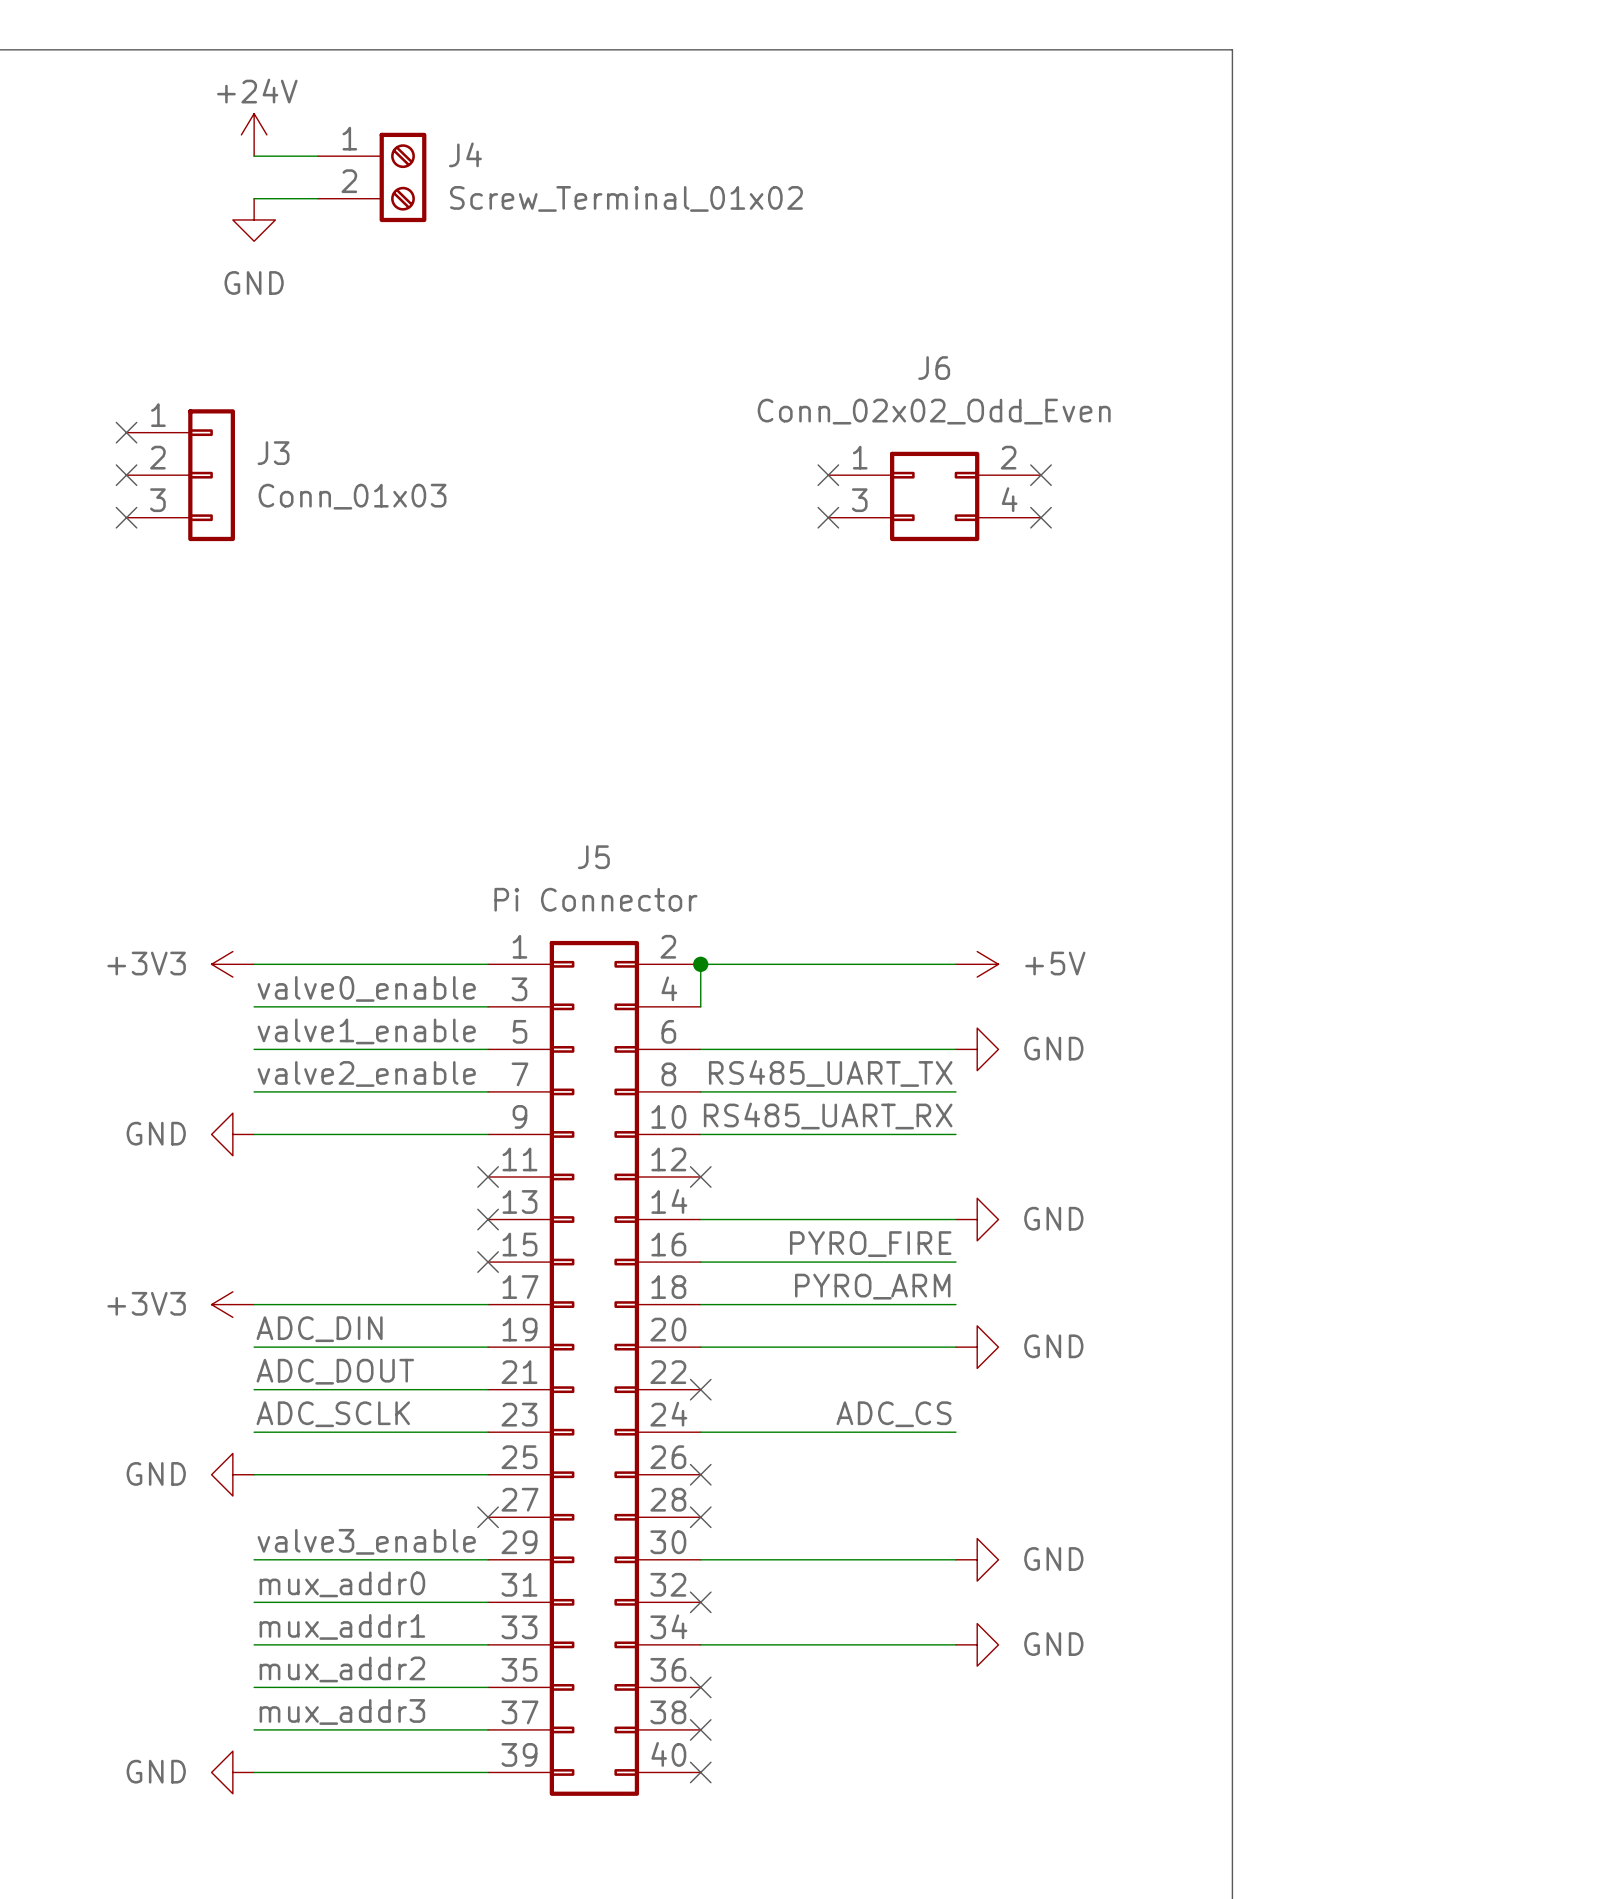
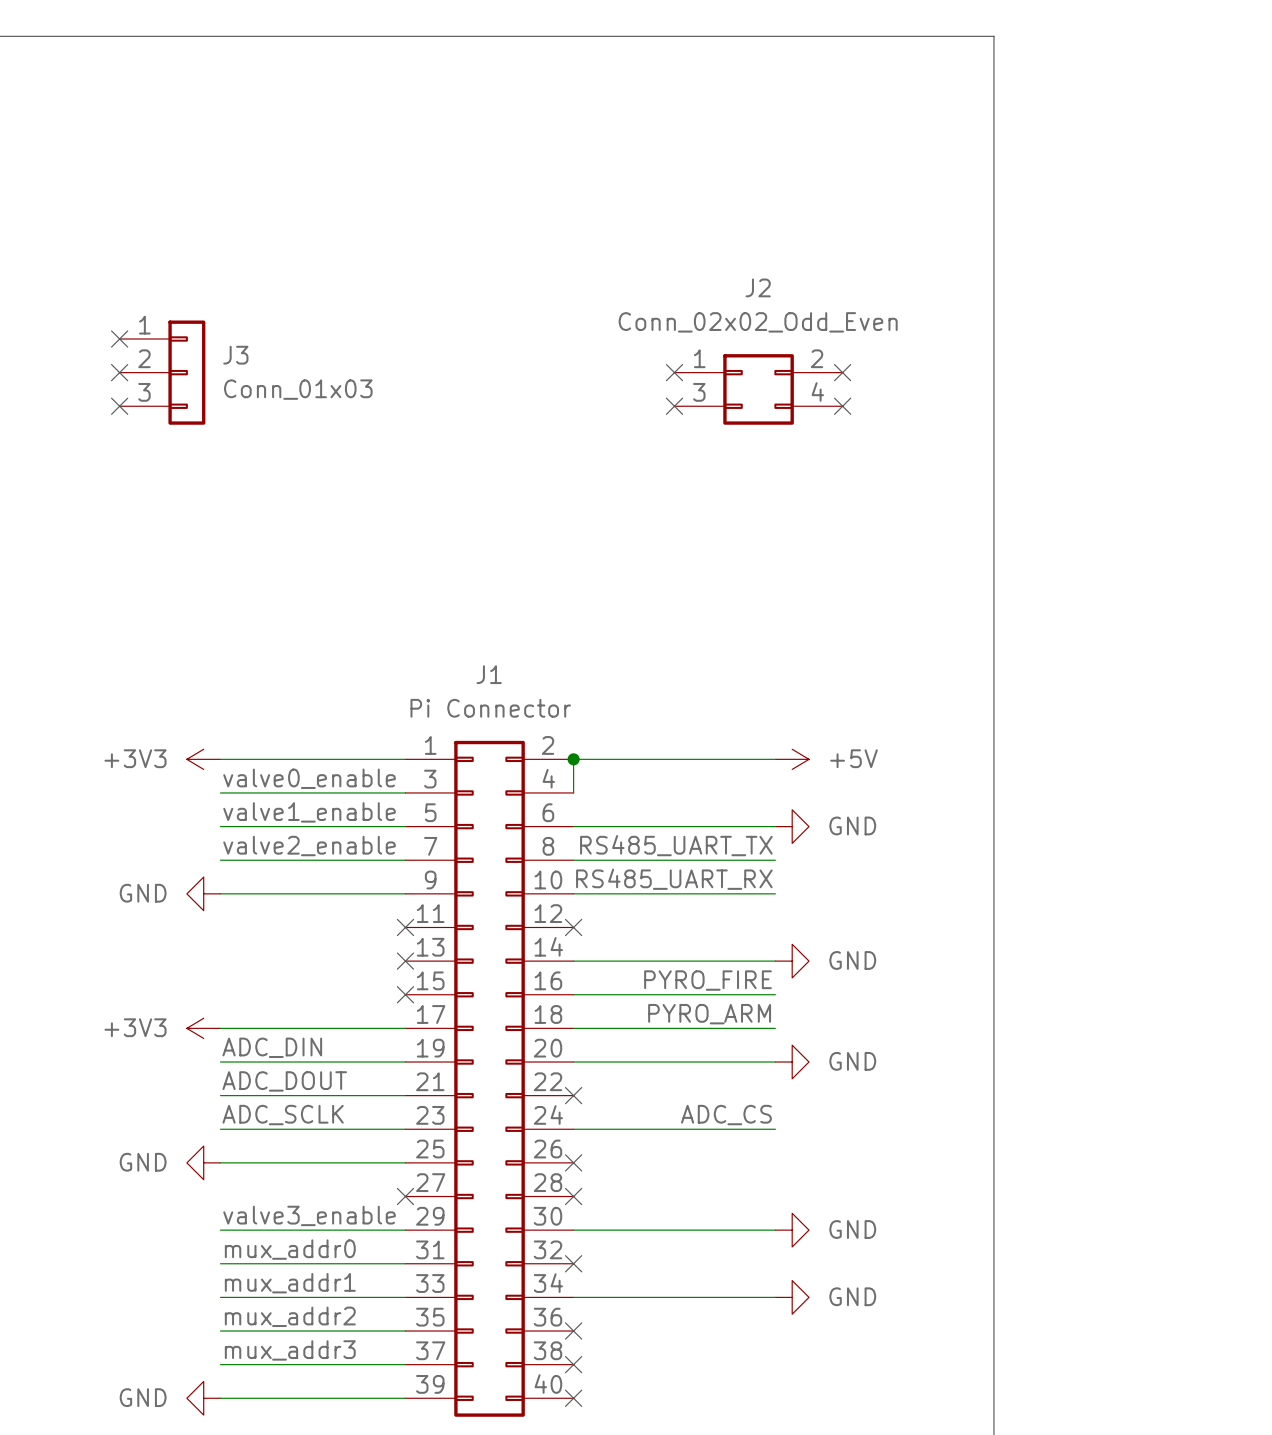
power symbol: +24V (254, 134) -> none
wire: (254, 156) (317, 156) -> none
J4: Screw_Terminal_01x02 (372, 177) -> none
wire: (254, 198) (317, 198) -> none
power symbol: GND (254, 219) -> none
J6 name: J6 (934, 368) -> J2 (758, 287)
J5 name: J5 (593, 857) -> J1 (489, 674)

